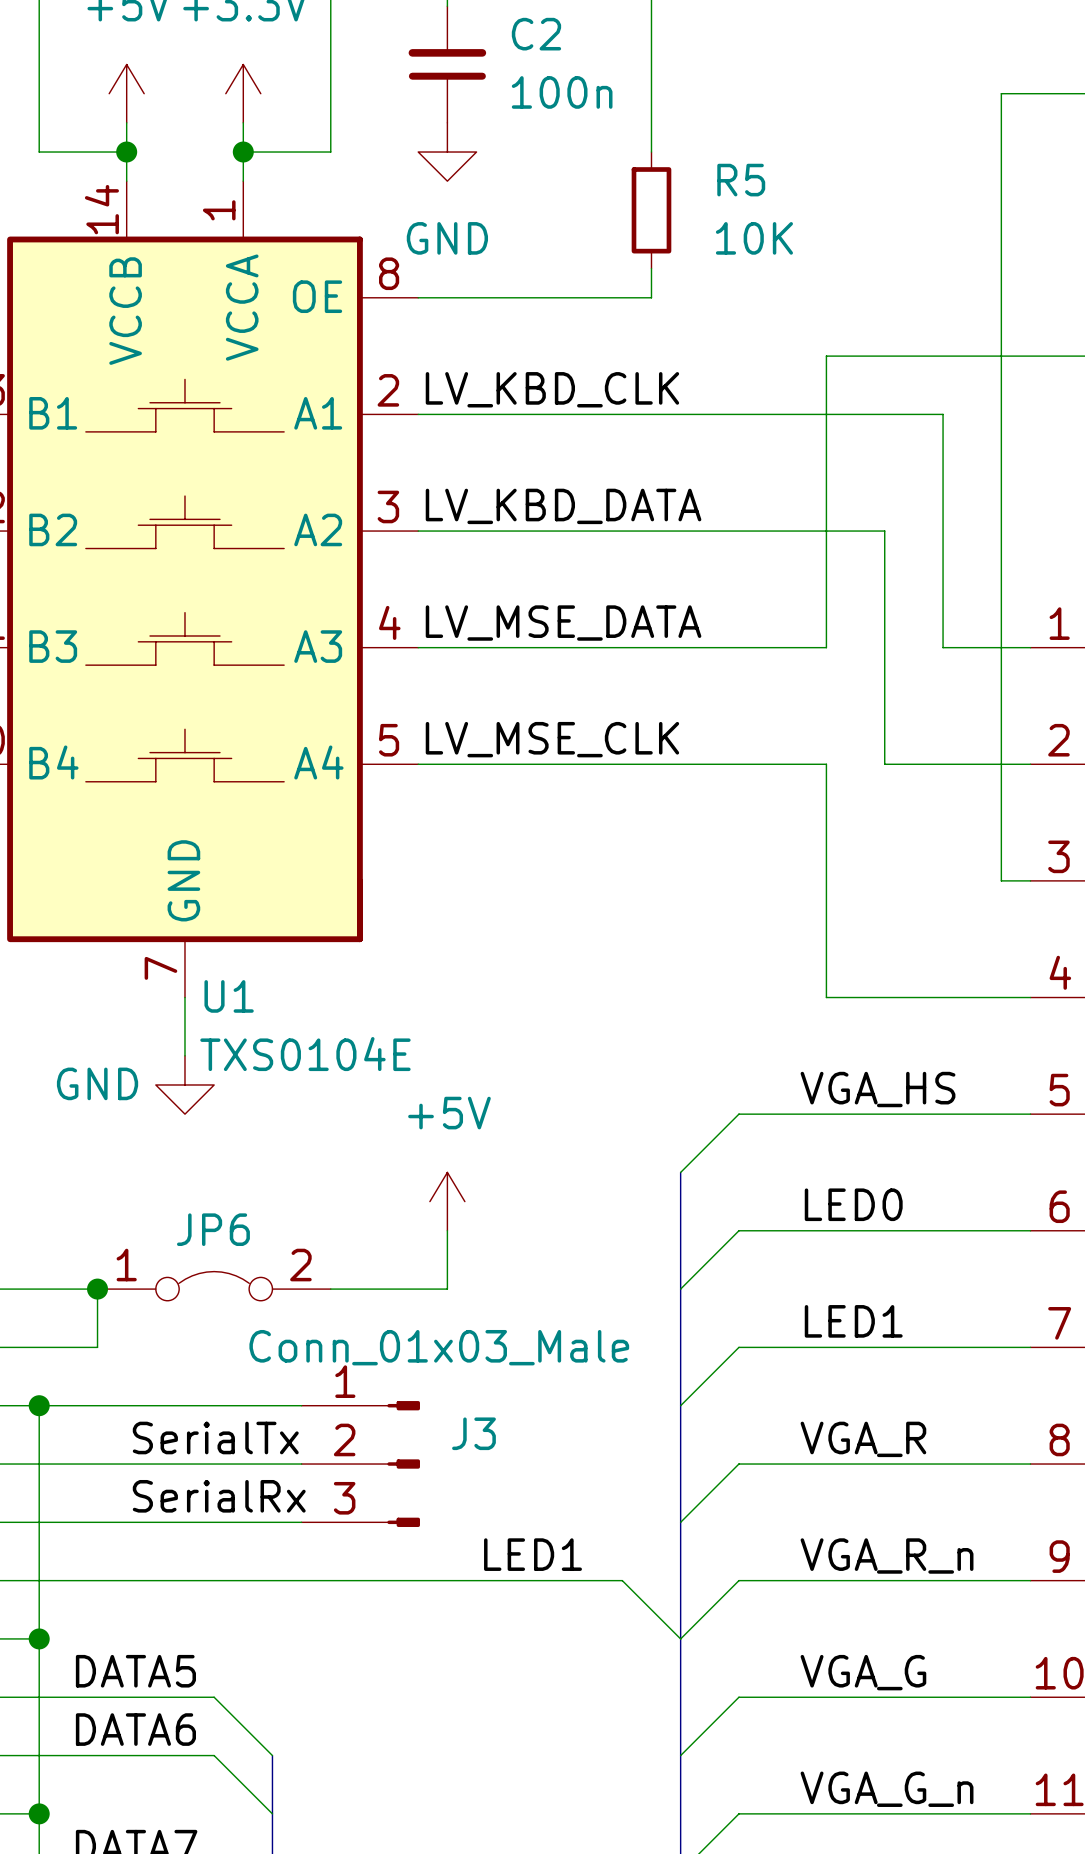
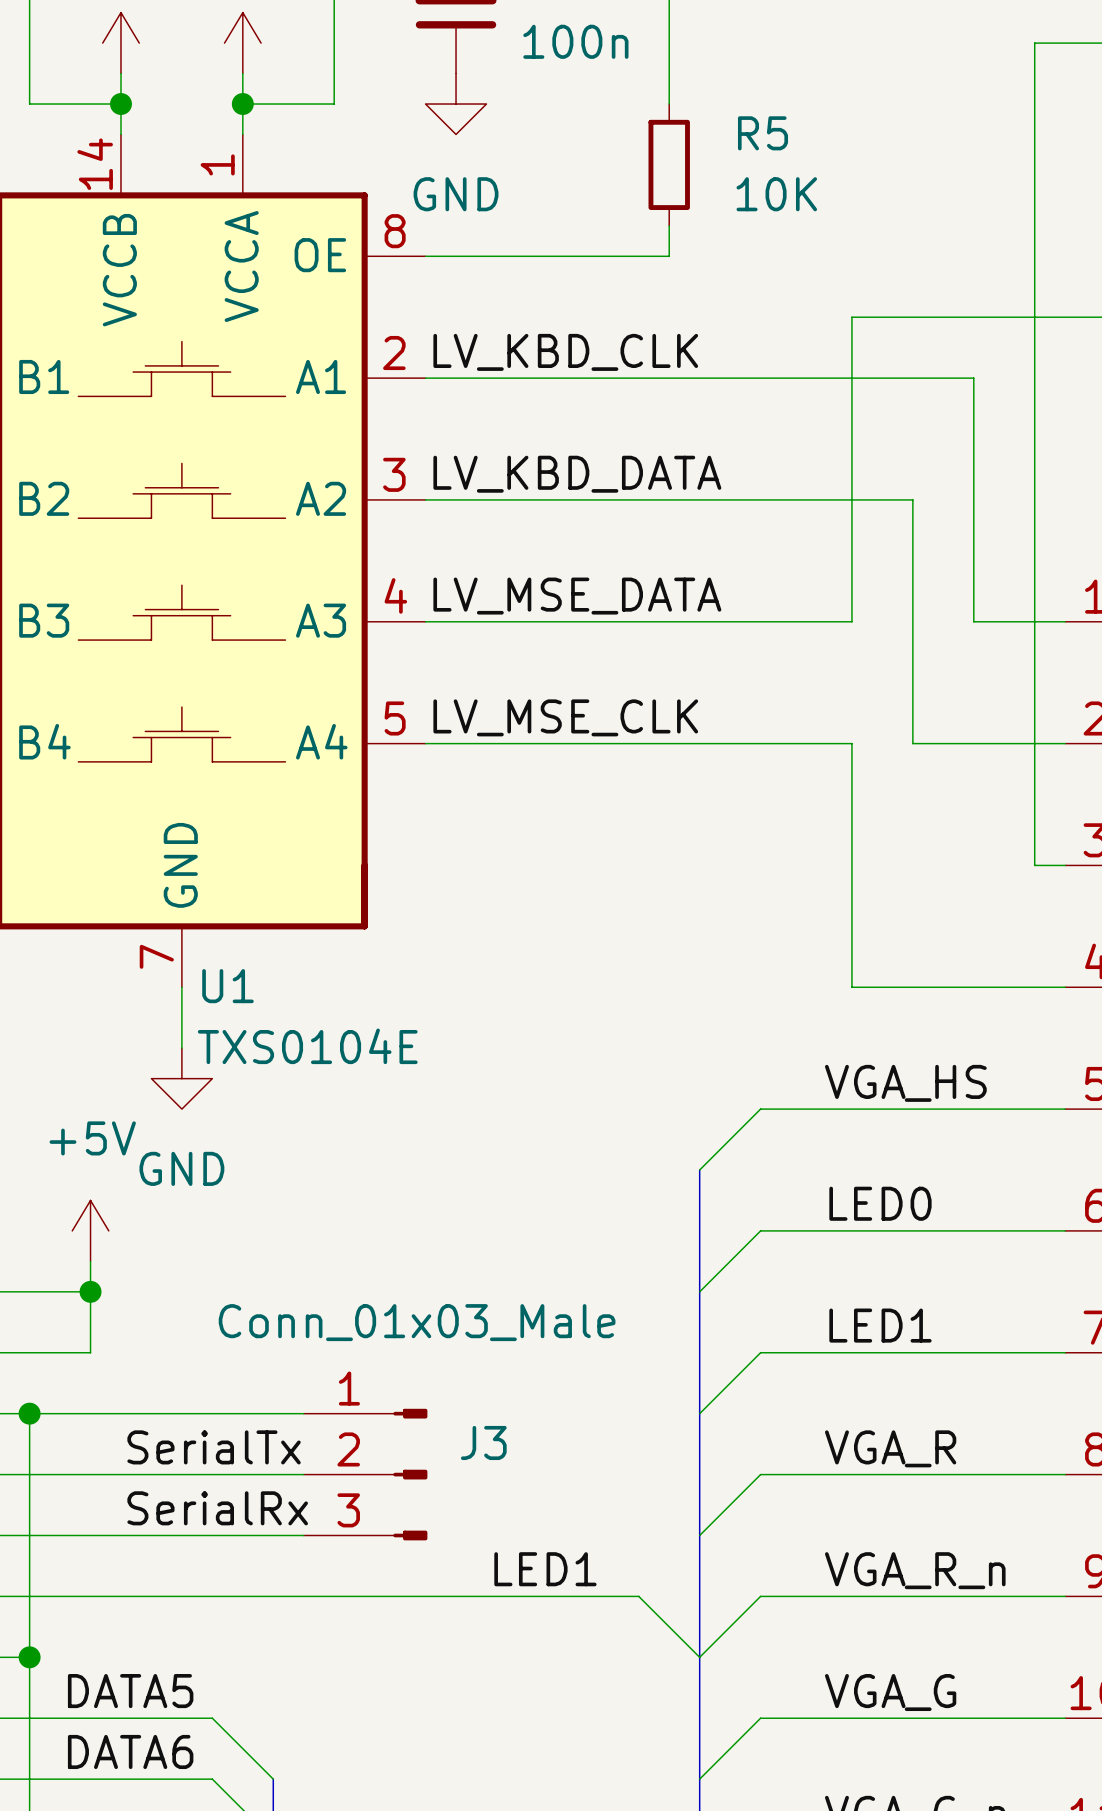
power symbol text position: GND (97, 1083) -> GND (181, 1168)
power symbol position: +5V (447, 1201) -> +5V (90, 1230)
wire: (447, 1230) (447, 1289) (330, 1289) -> none
wire: none -> (90, 1261) (90, 1291)
JP6: (214, 1286) -> none
J3 value position: Conn_01x03_Male (439, 1347) -> Conn_01x03_Male (417, 1322)

